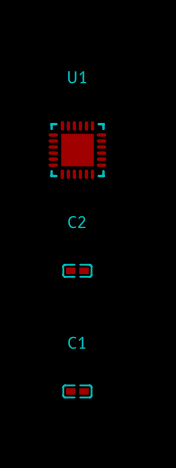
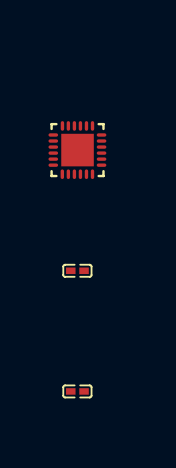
U1 name: U1 (77, 77) -> none
C2 name: C2 (76, 222) -> none
C1 name: C1 (76, 342) -> none

